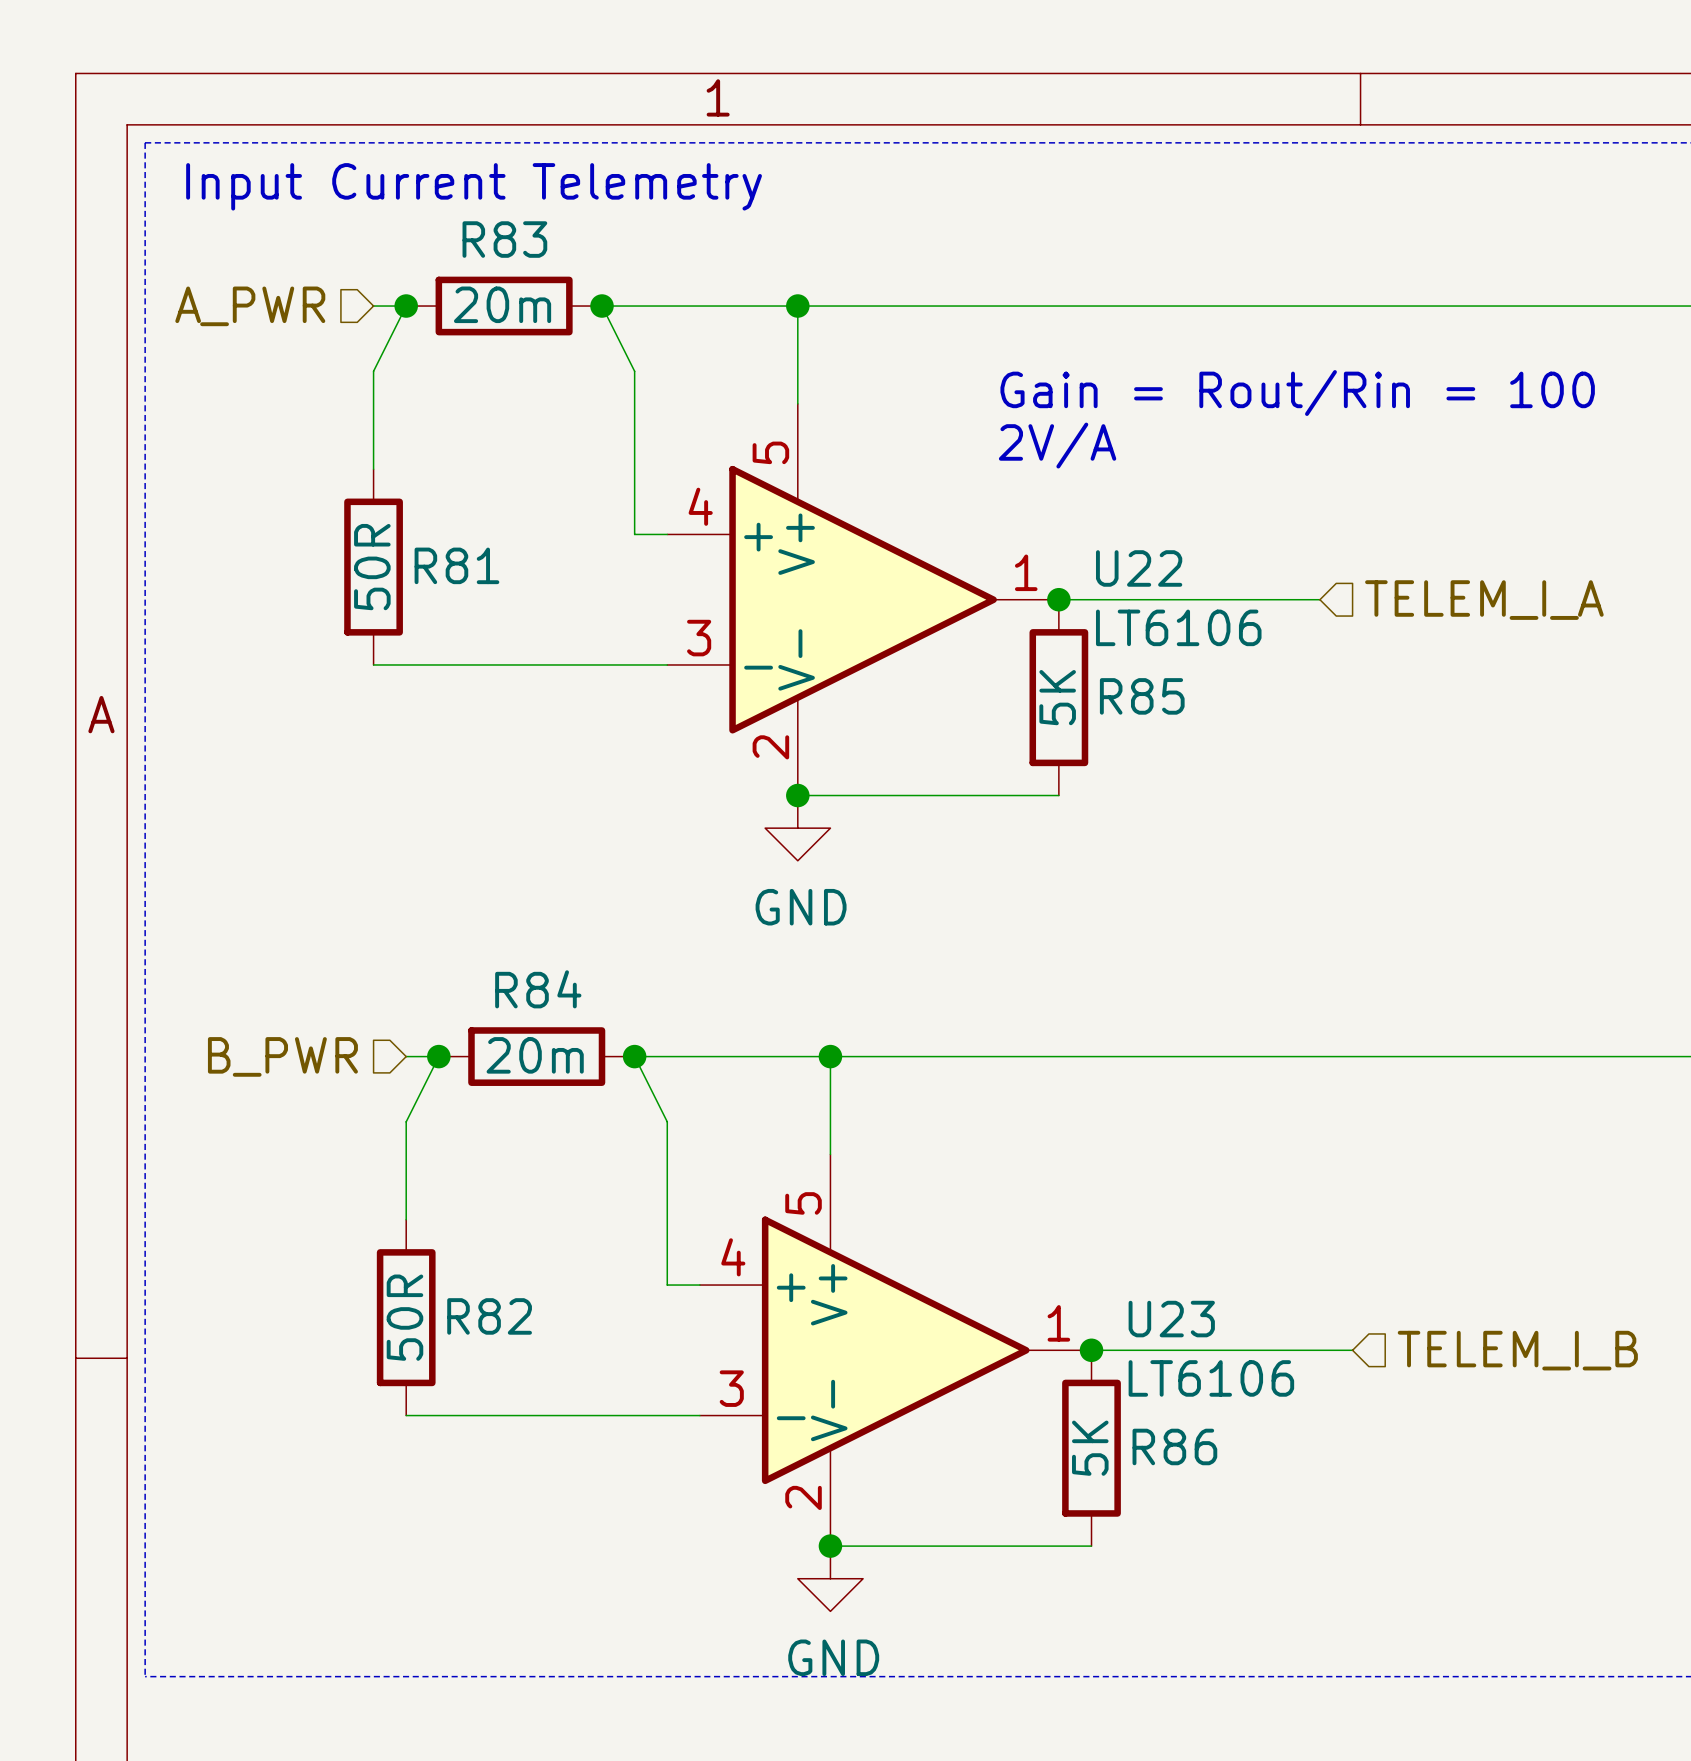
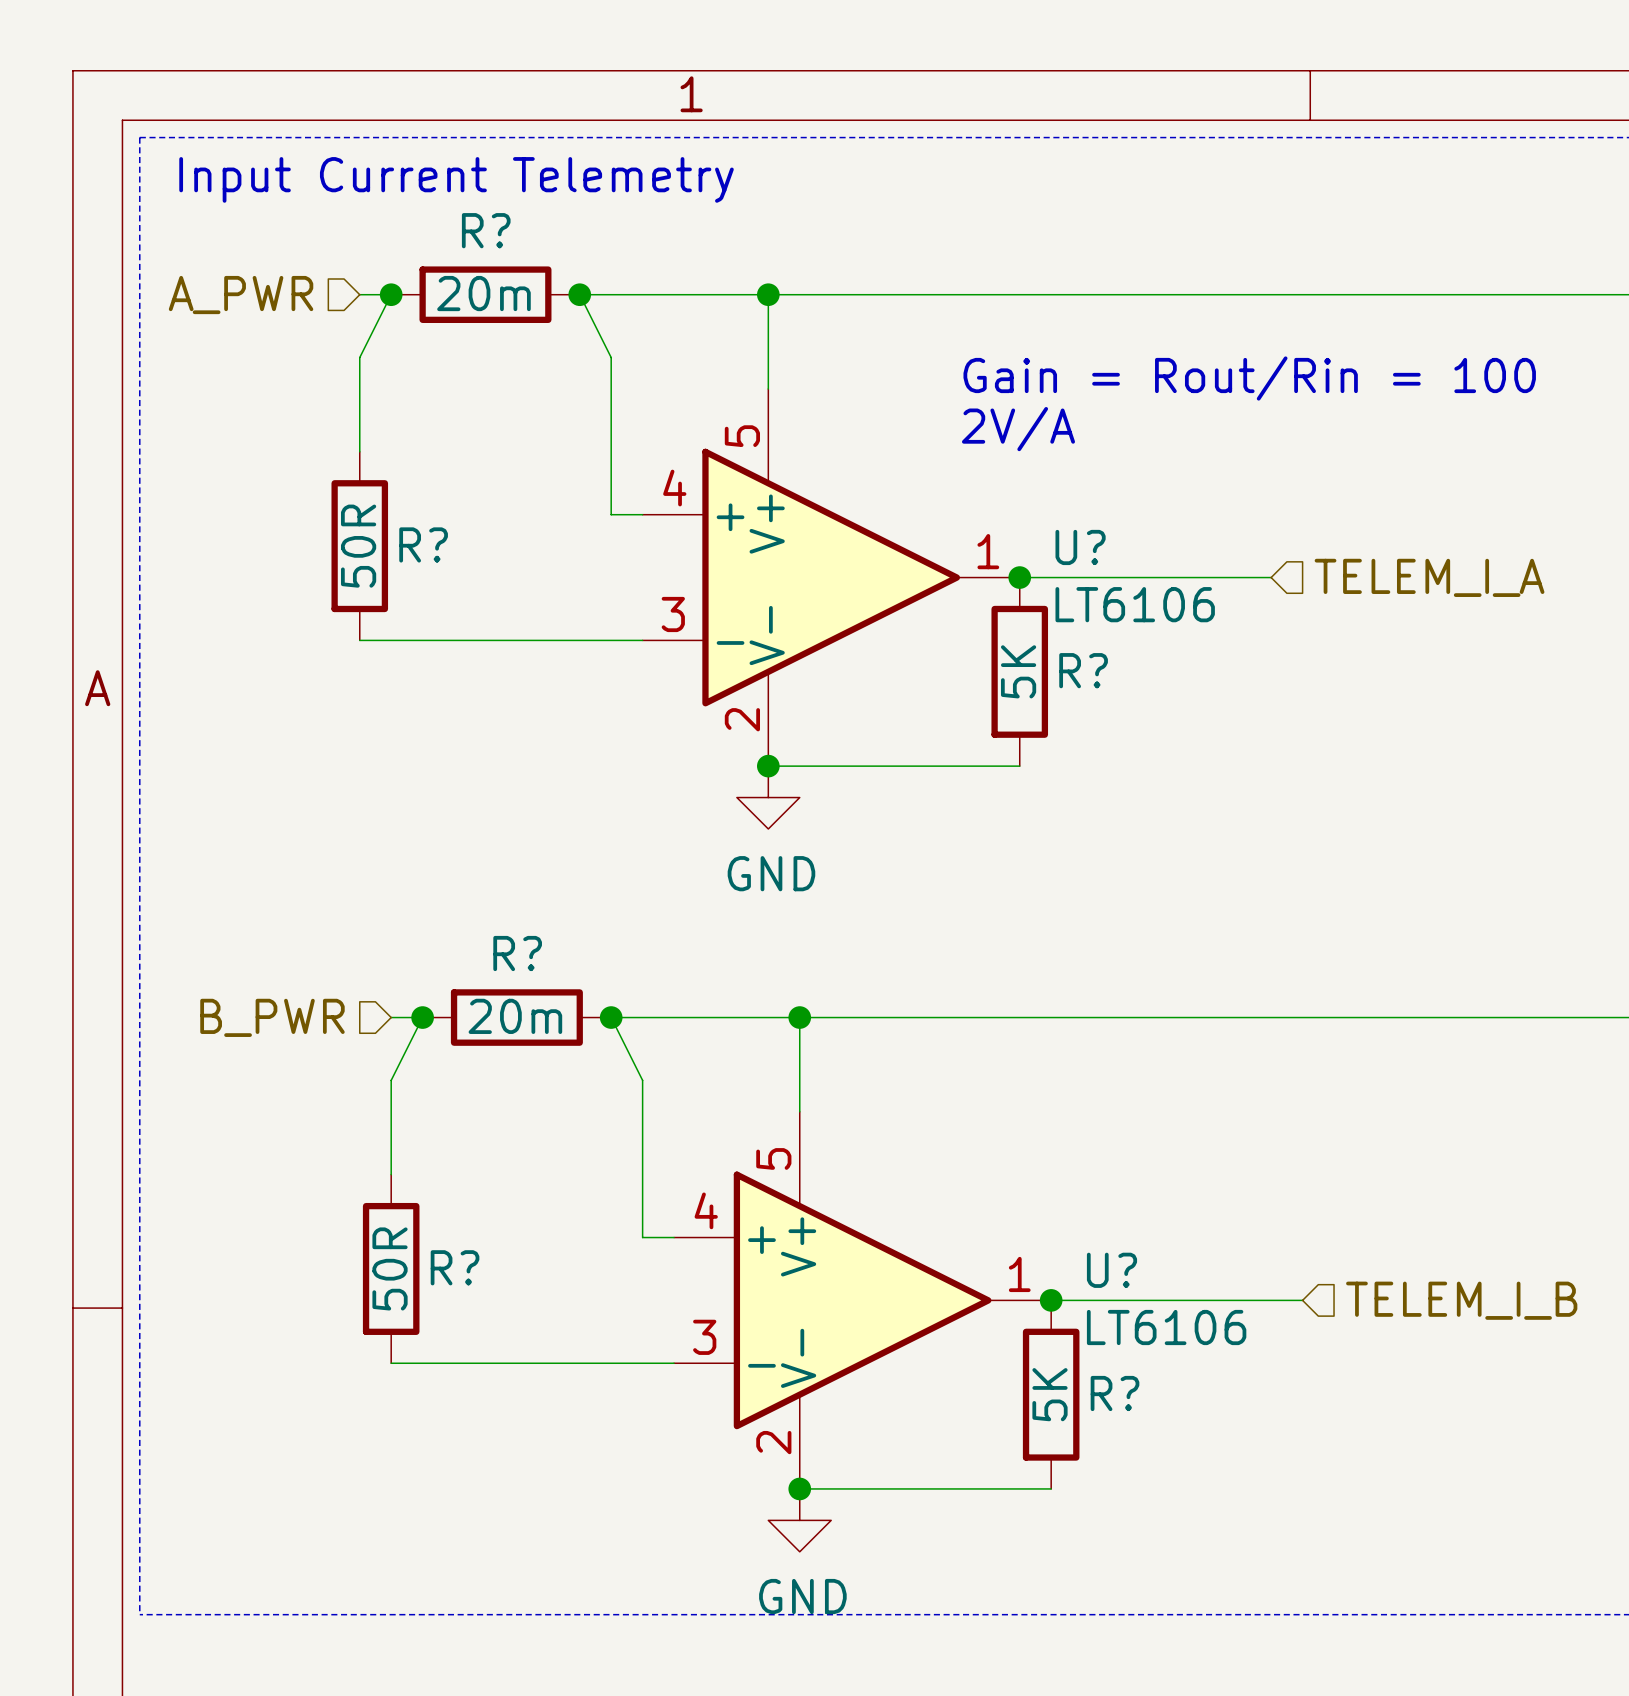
R83 name: R83 (504, 239) -> R? (486, 230)
R81 name: R81 (456, 565) -> R? (423, 544)
U22 name: U22 (1139, 568) -> U? (1080, 547)
R85 name: R85 (1142, 696) -> R? (1083, 670)
R84 name: R84 (538, 989) -> R? (517, 953)
R82 name: R82 (489, 1316) -> R? (455, 1267)
U23 name: U23 (1171, 1319) -> U? (1111, 1270)
R86 name: R86 (1174, 1446) -> R? (1115, 1393)

